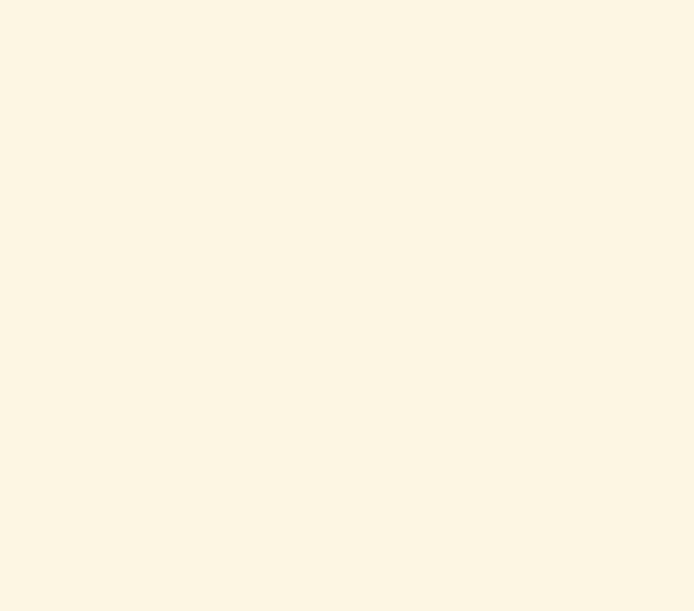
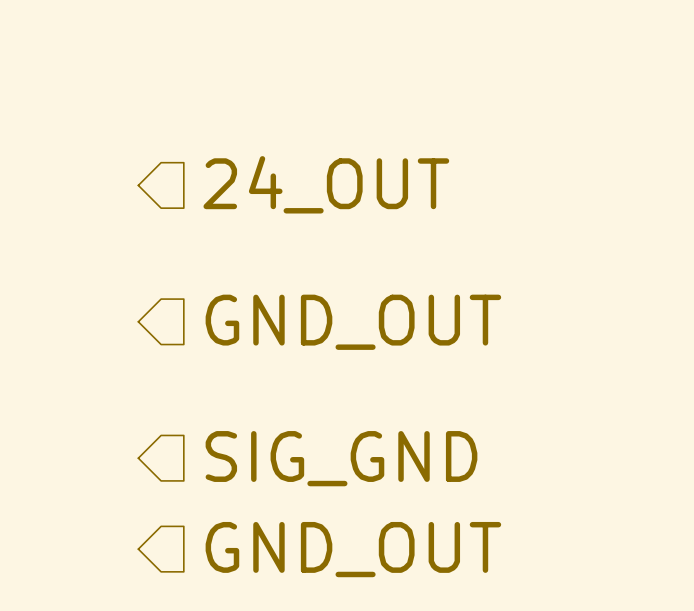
hierarchical label: none -> 24_OUT (326, 184)
hierarchical label: none -> GND_OUT (353, 322)
hierarchical label: none -> SIG_GND (341, 458)
hierarchical label: none -> GND_OUT (353, 549)

